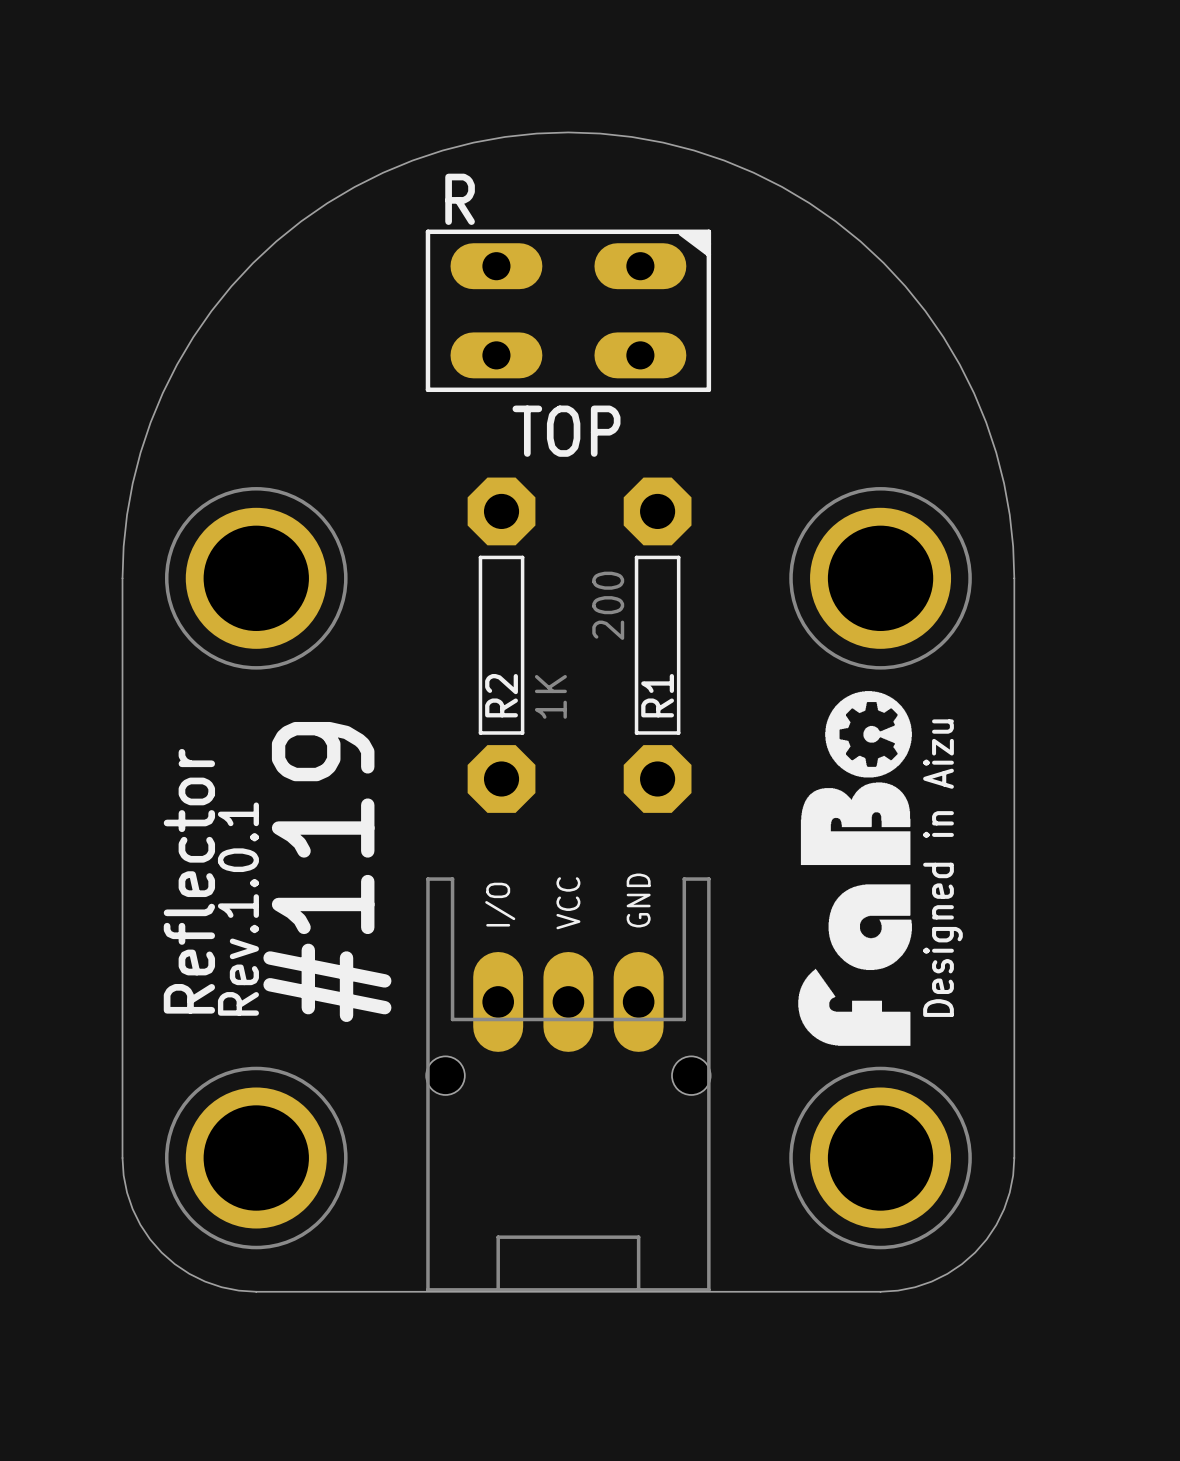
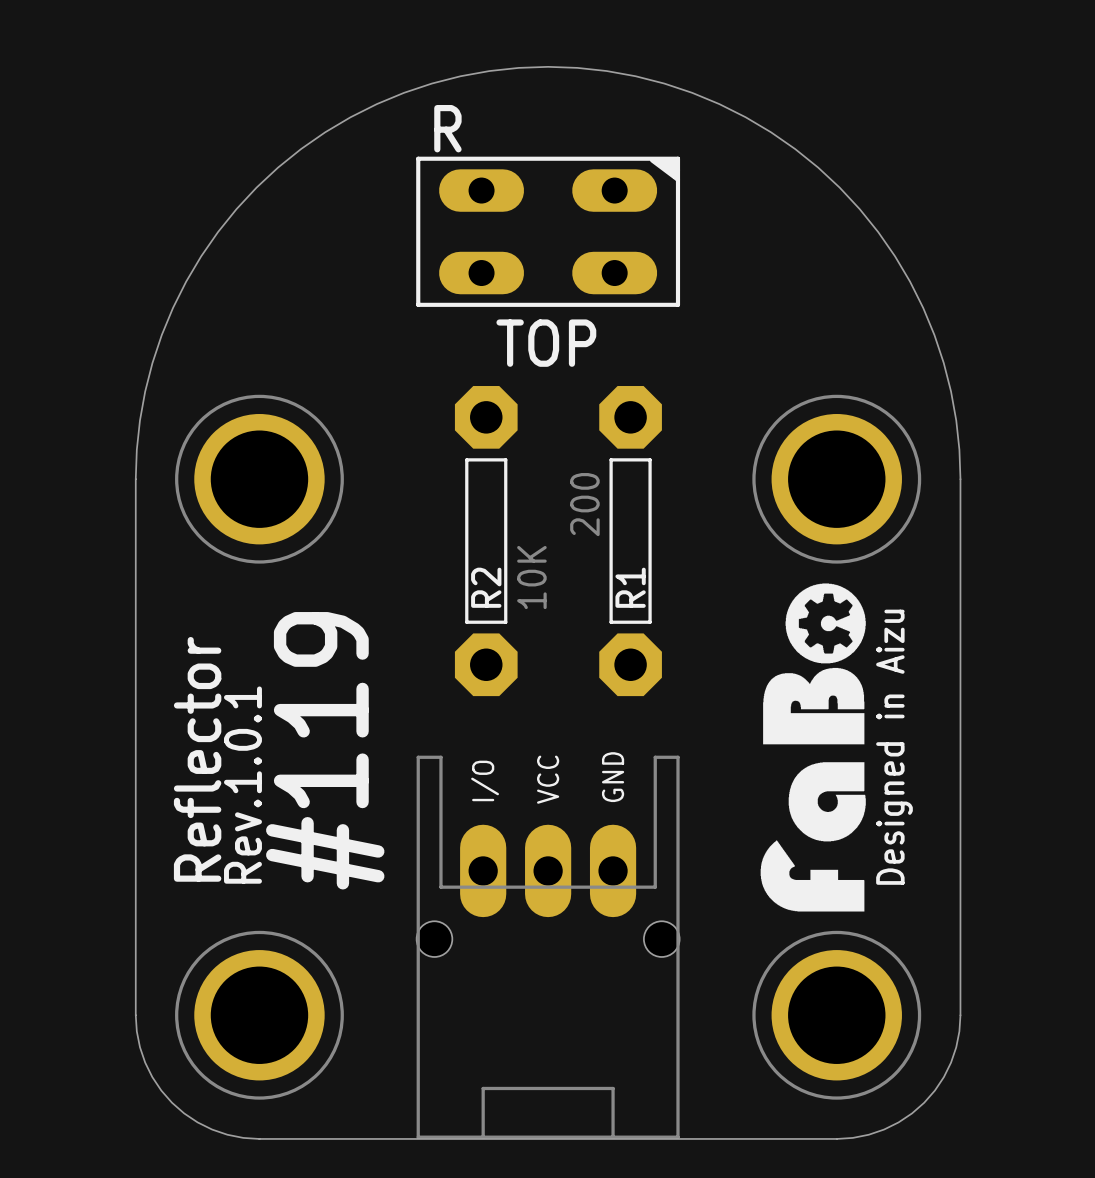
R2 value: 1K (550, 696) -> 10K (531, 577)

